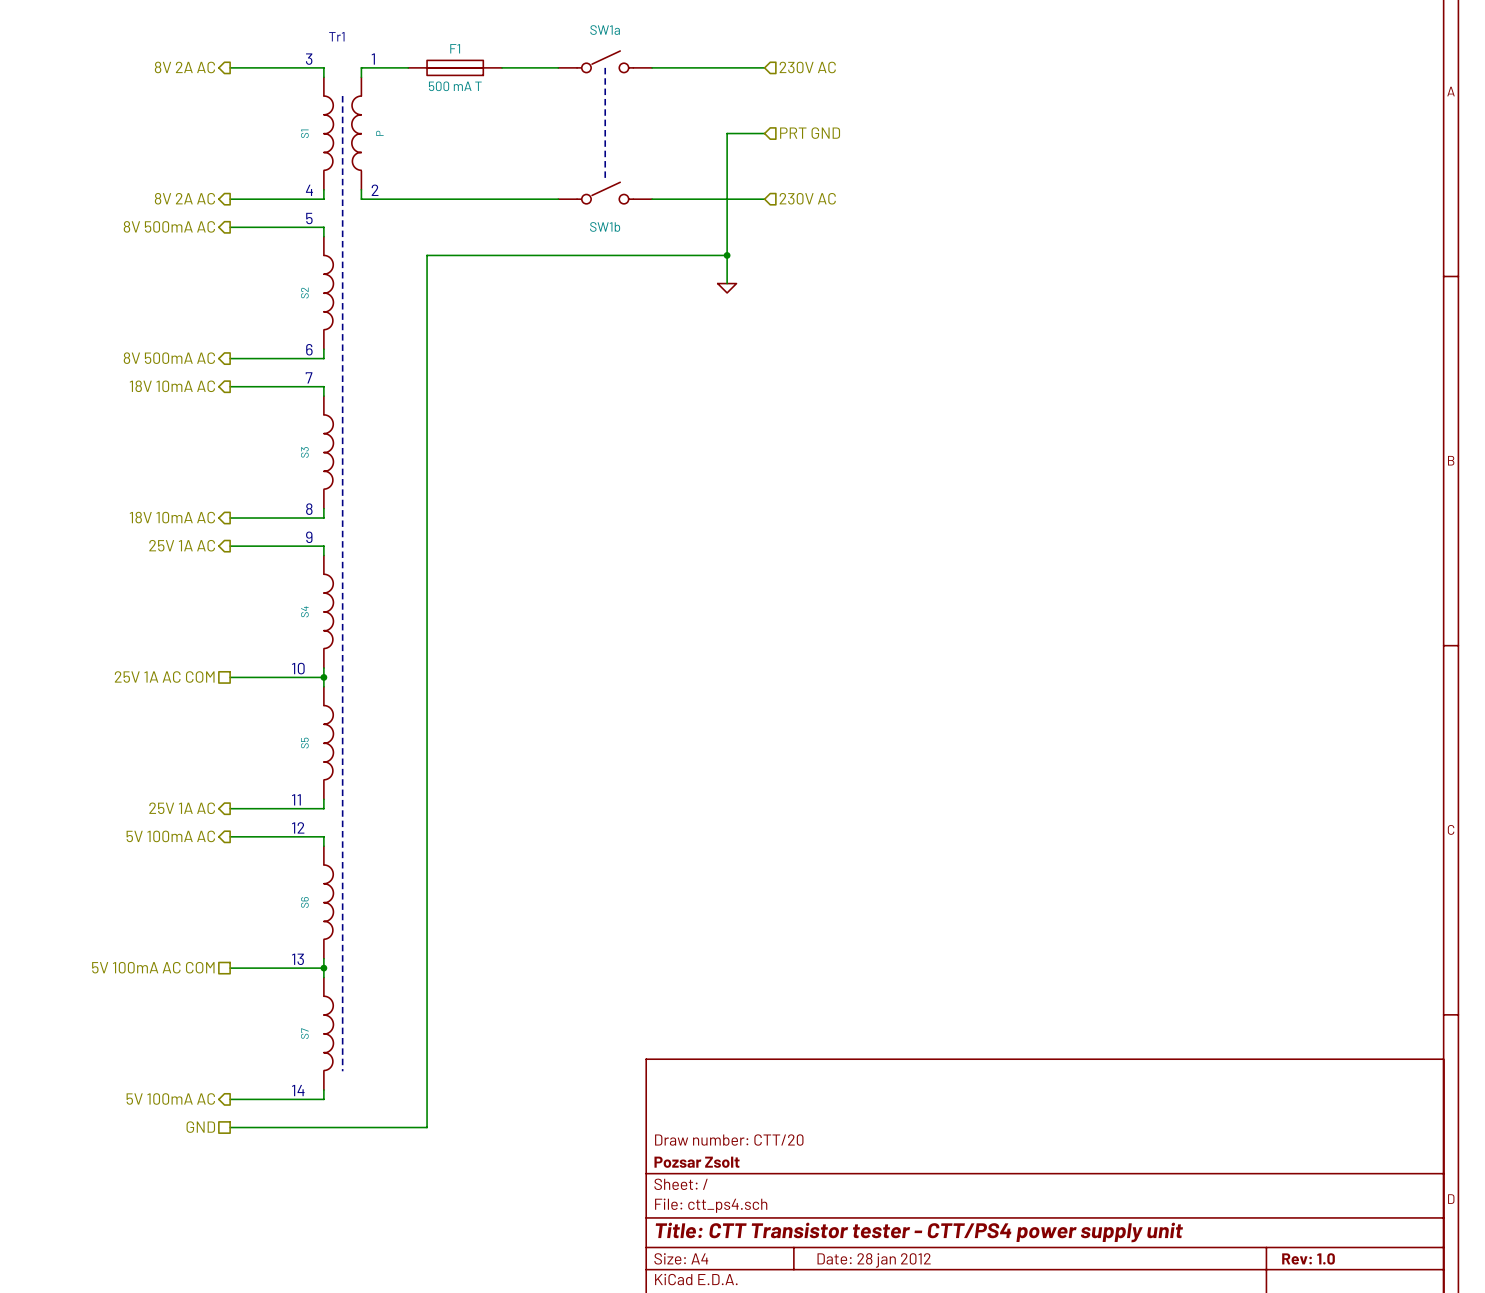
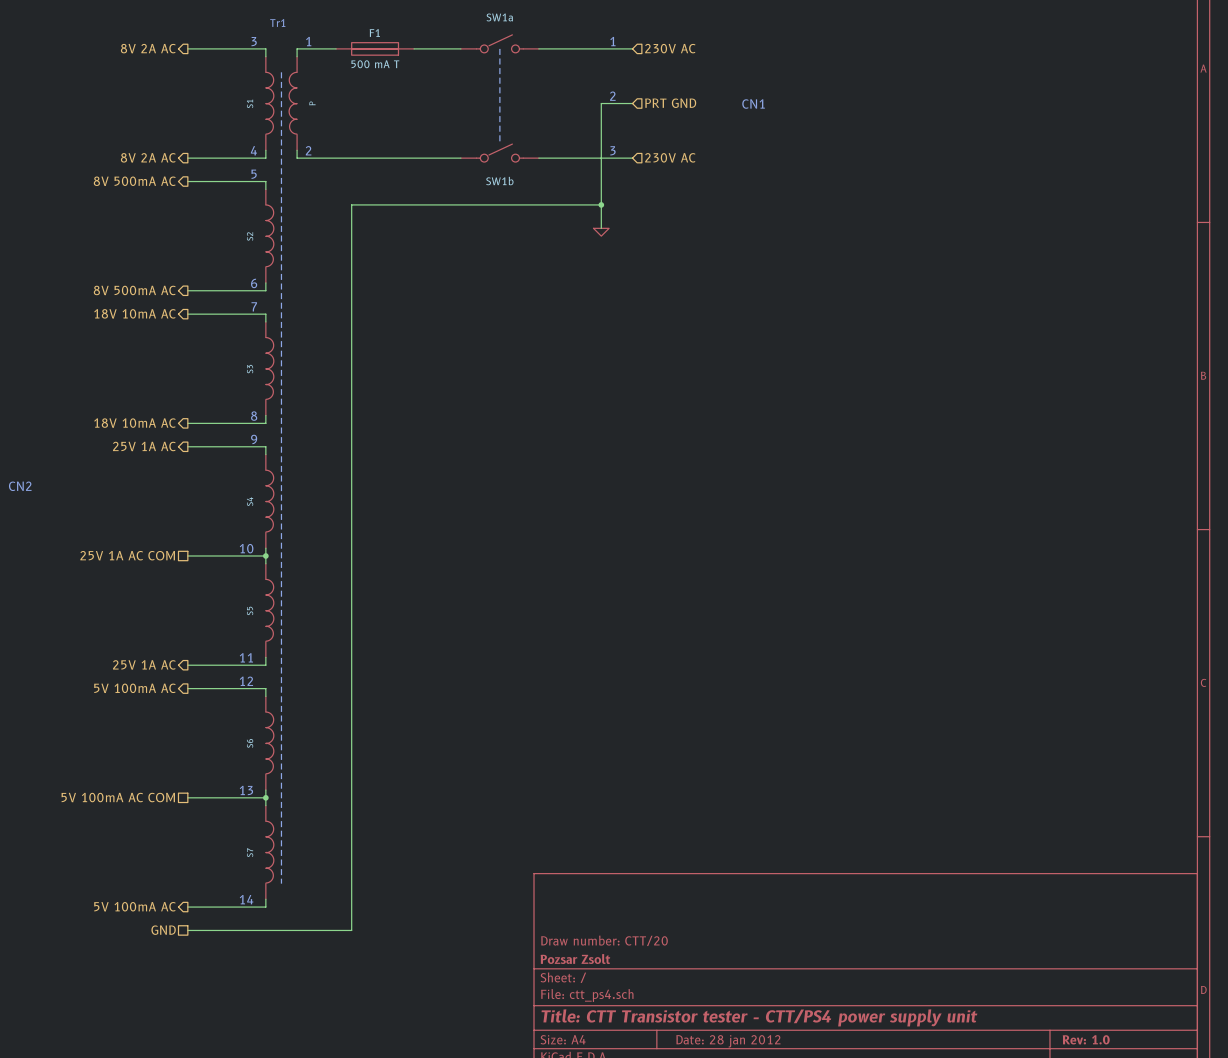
text: none -> 1 (612, 41)
text: none -> 2 (612, 96)
text: none -> CN1 (753, 104)
text: none -> 3 (612, 150)
text: none -> CN2 (20, 486)

